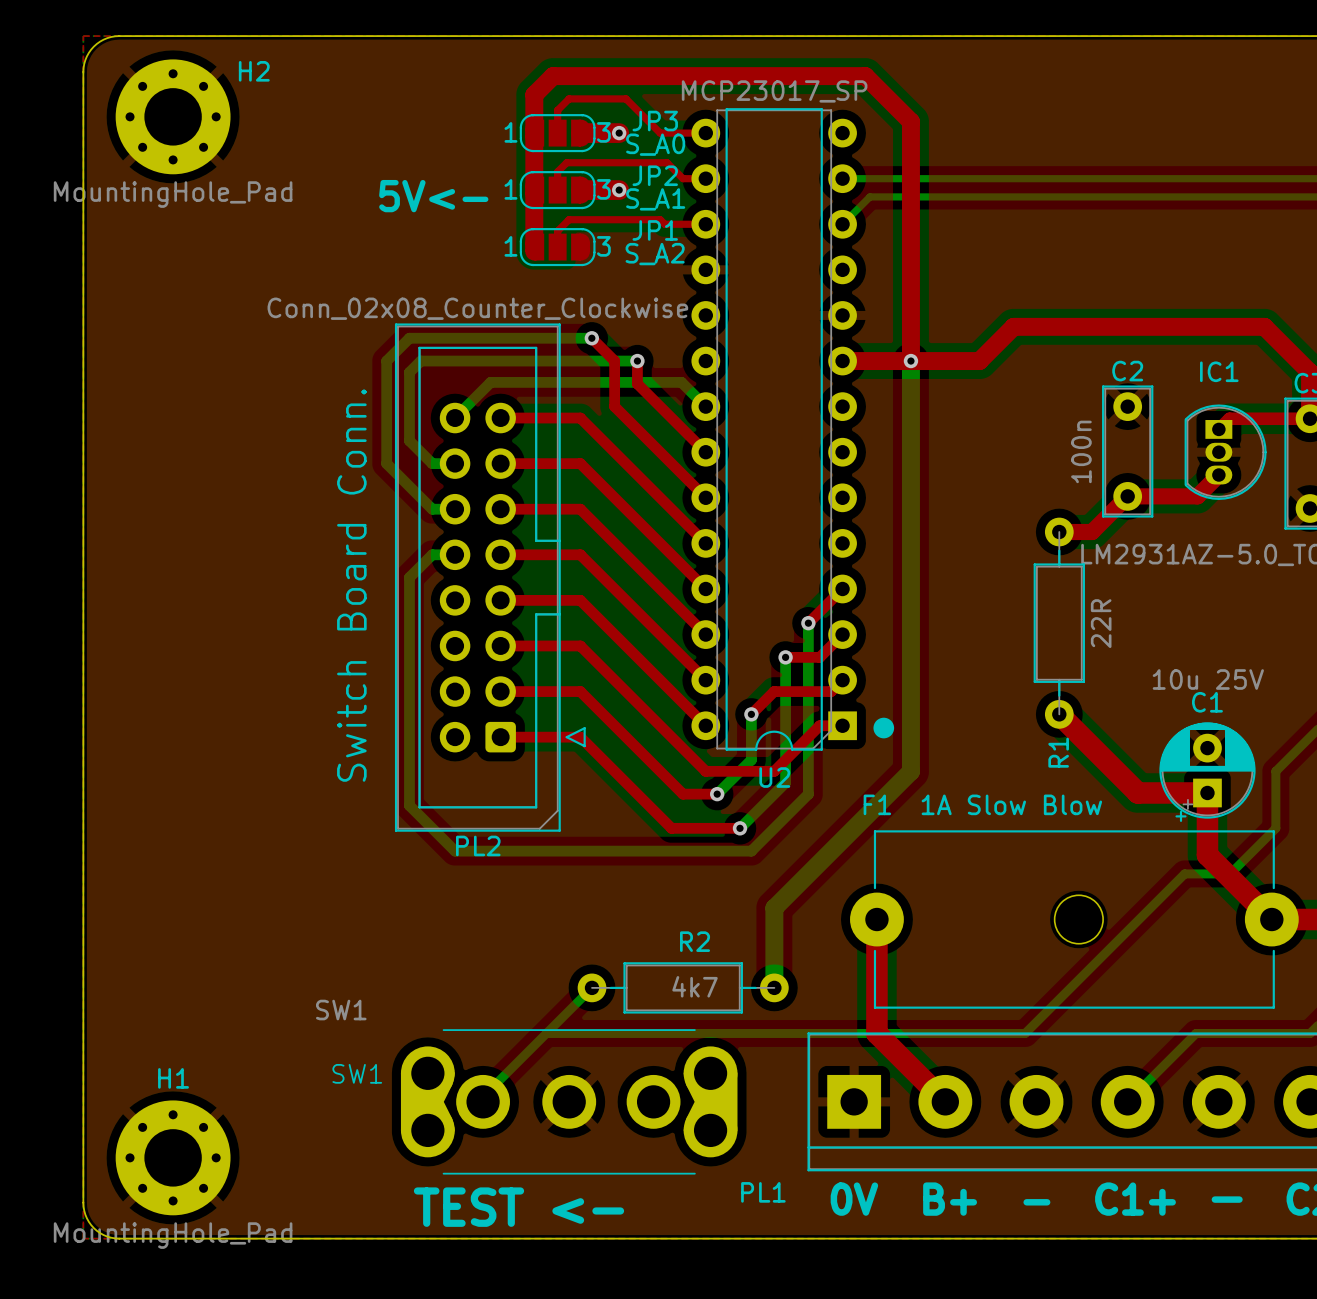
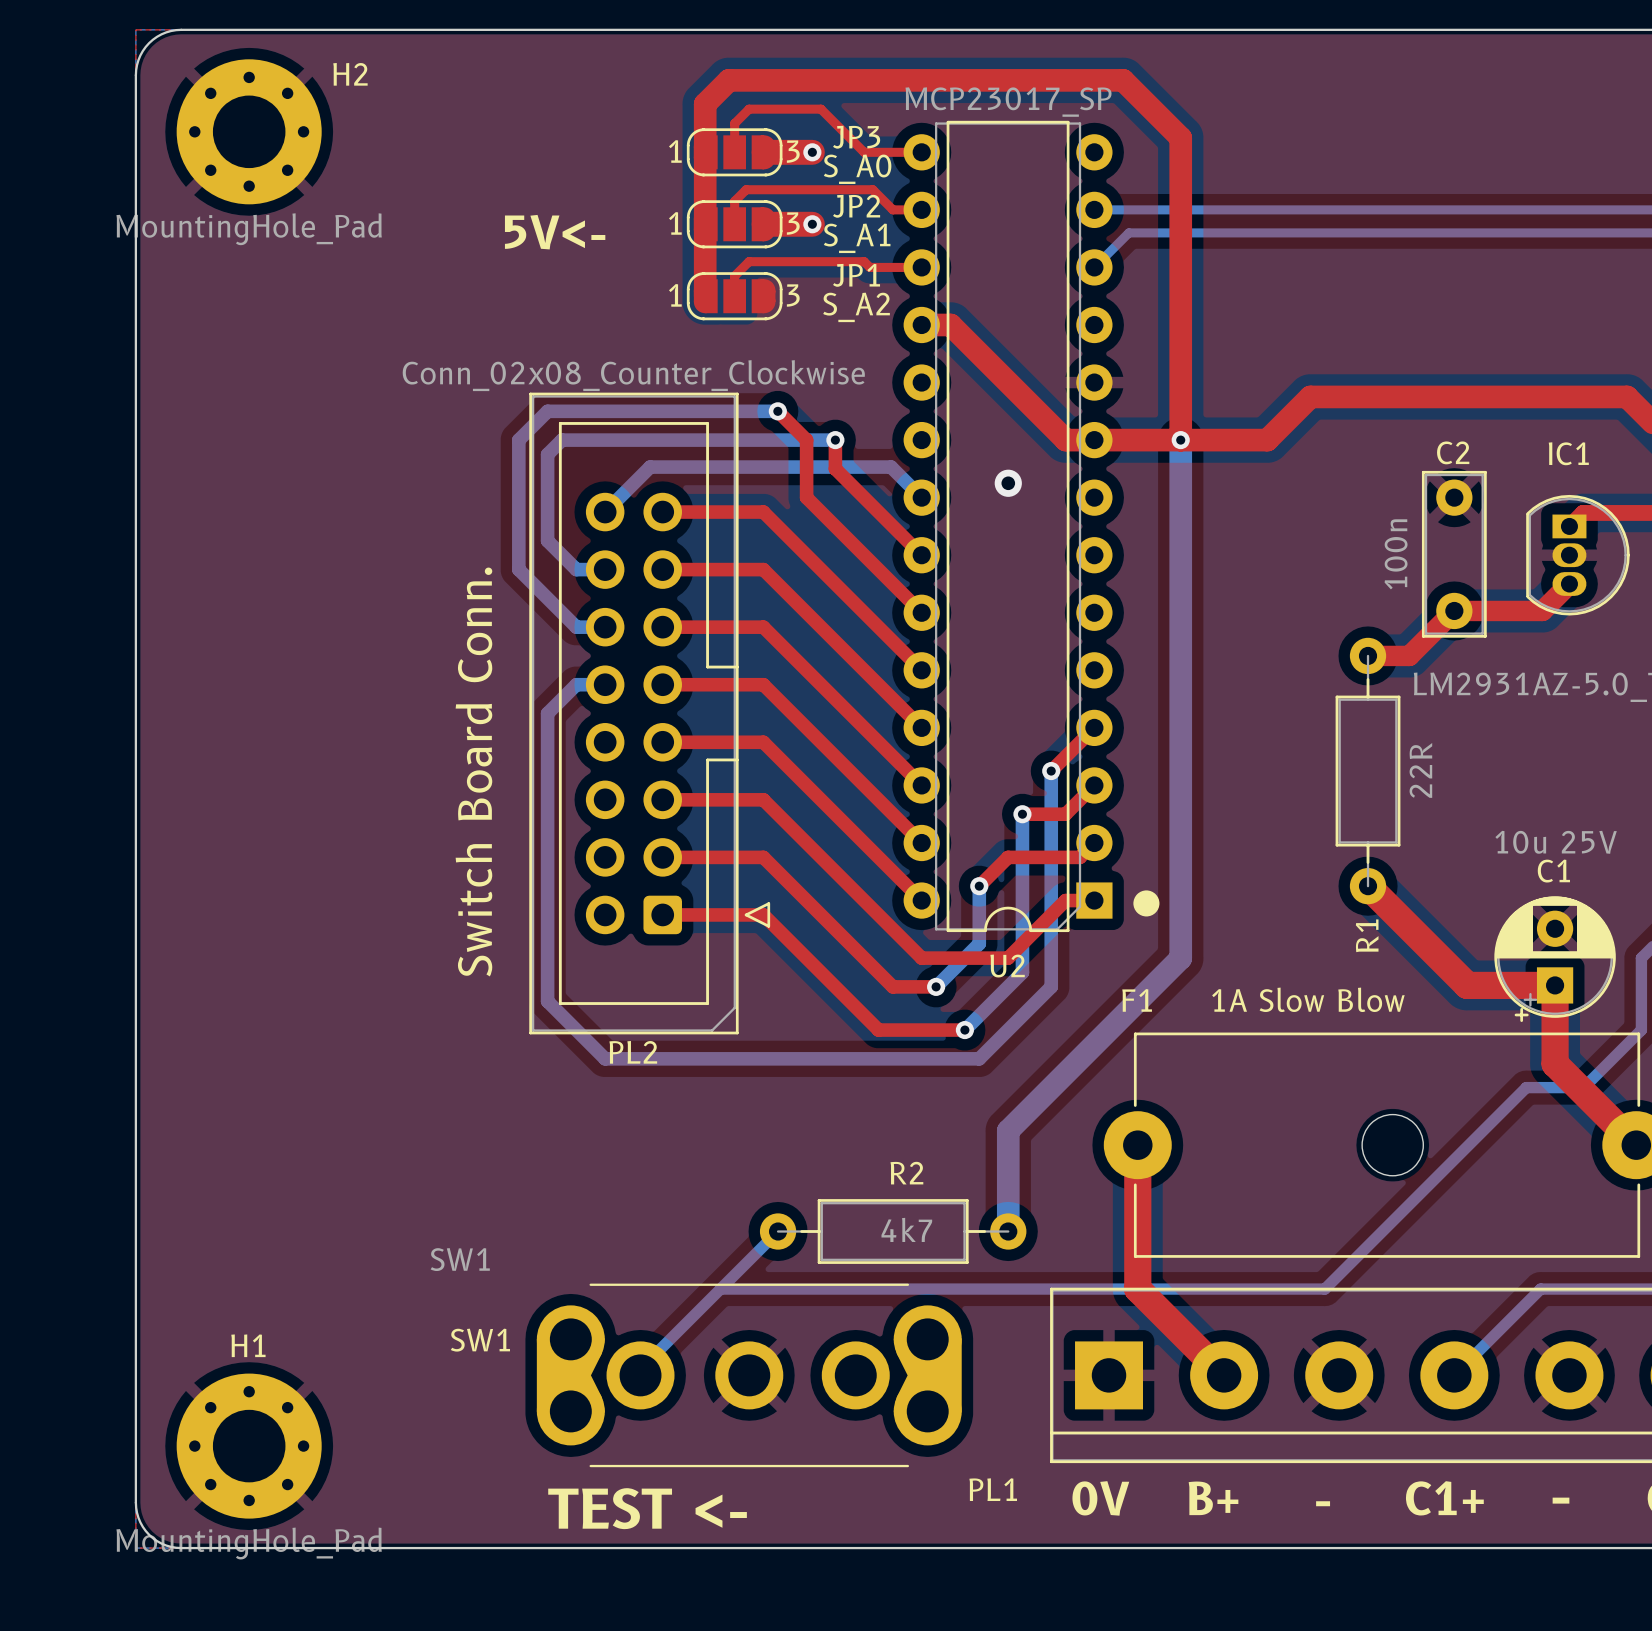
top track: none -> (921, 324) (950, 324) (1065, 440) (1094, 440)
via: none -> (1008, 483)

